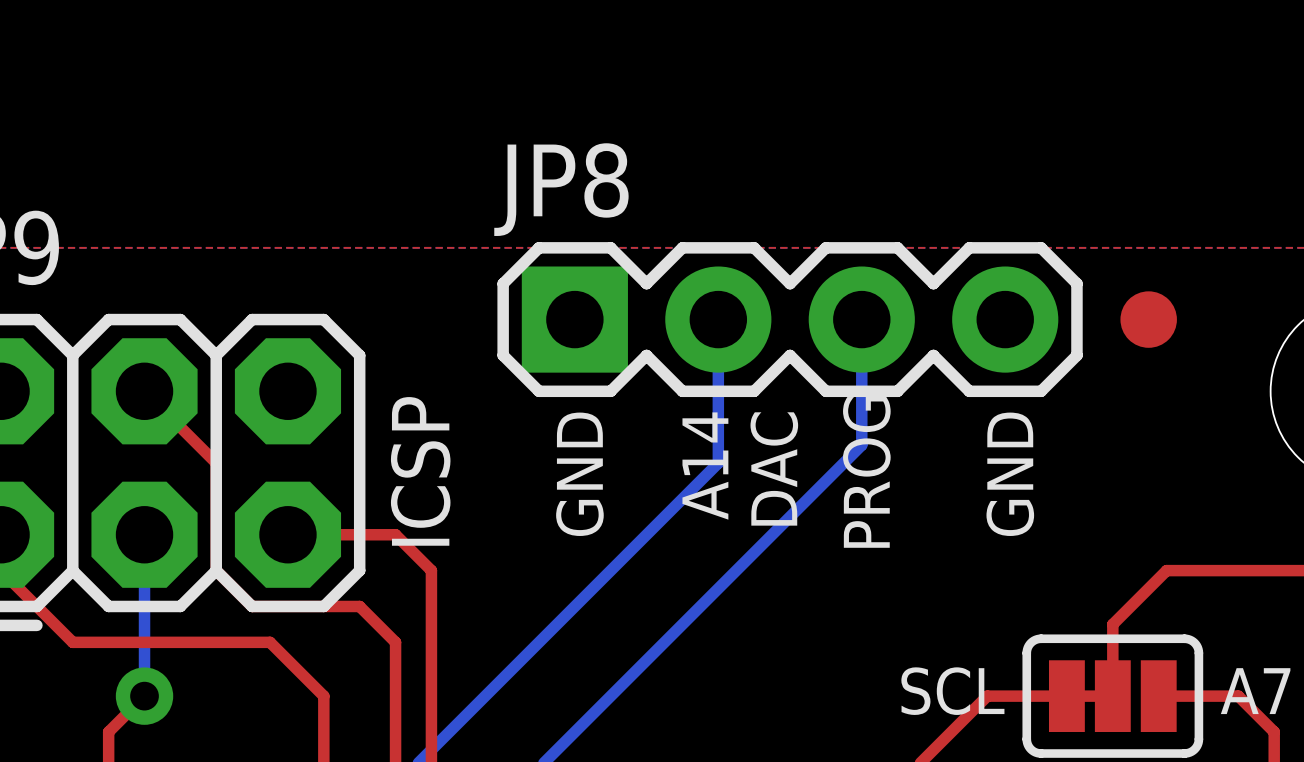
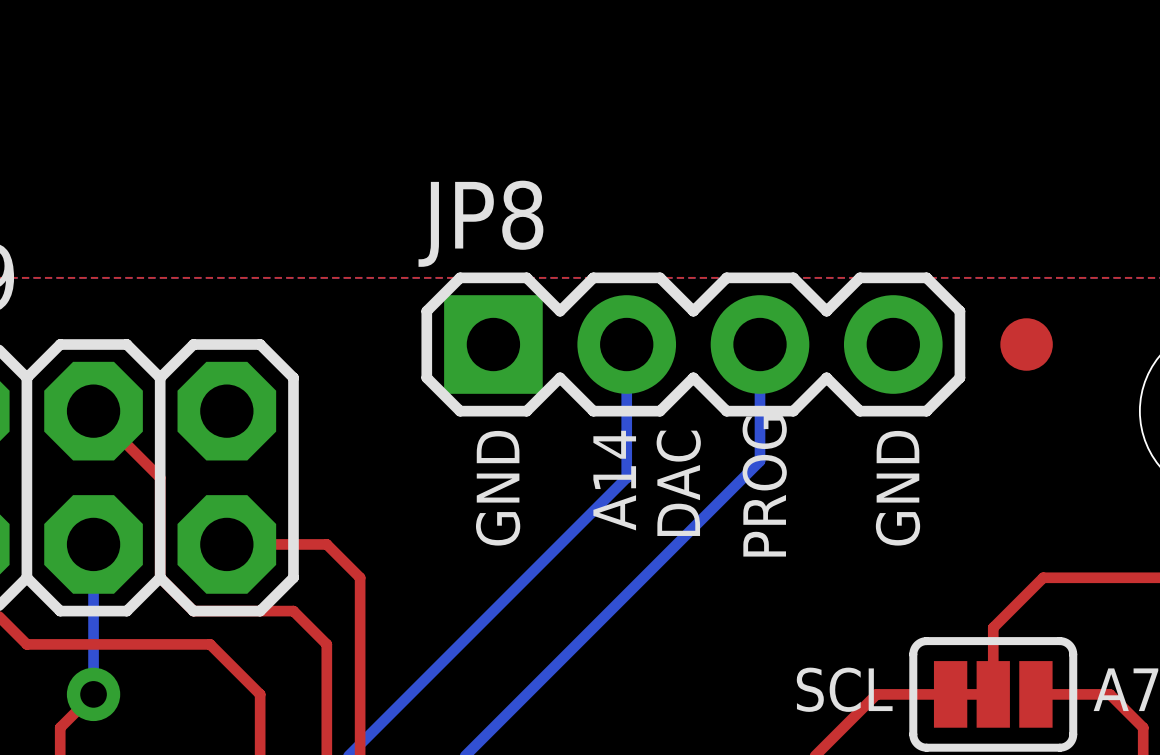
text: ICSP (420, 471) -> none

